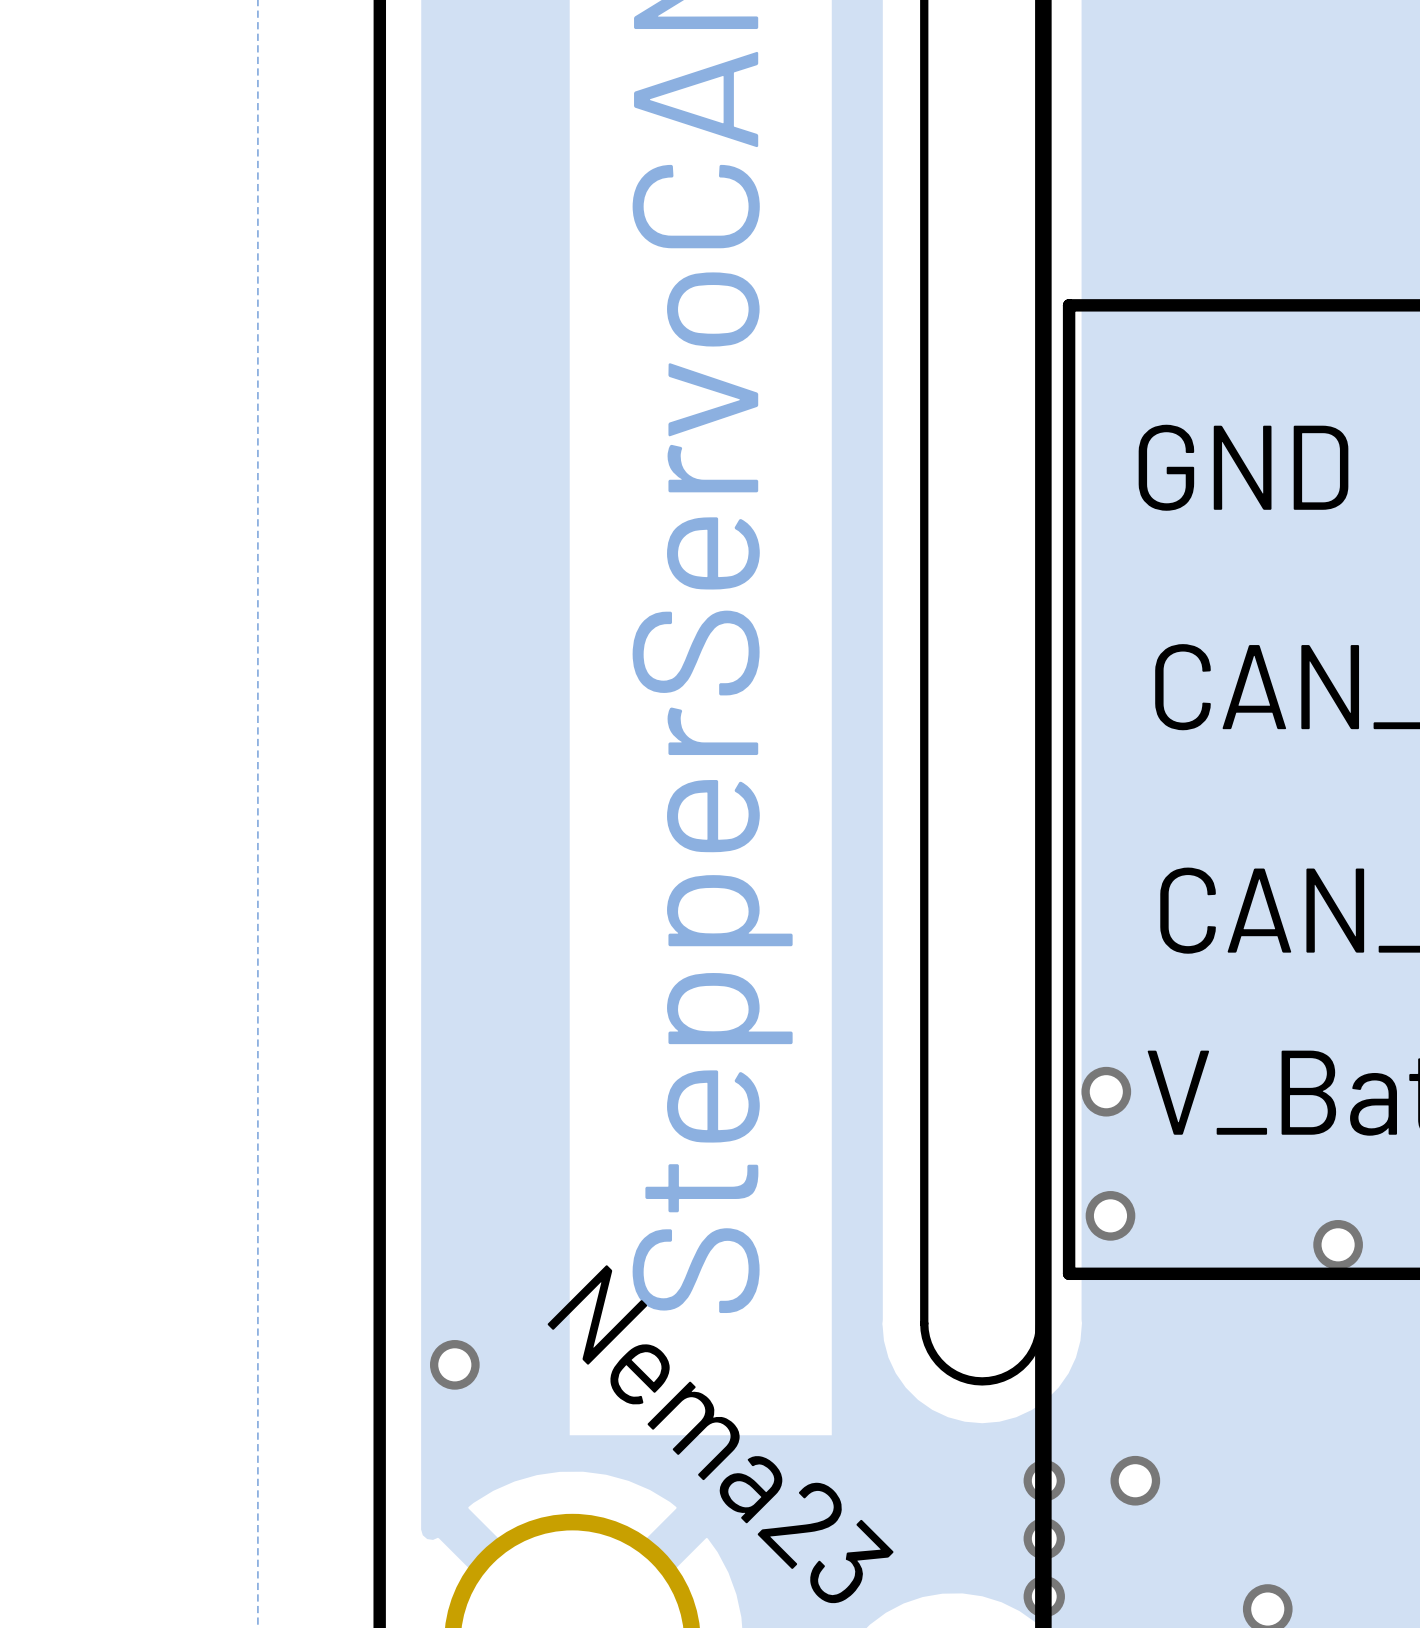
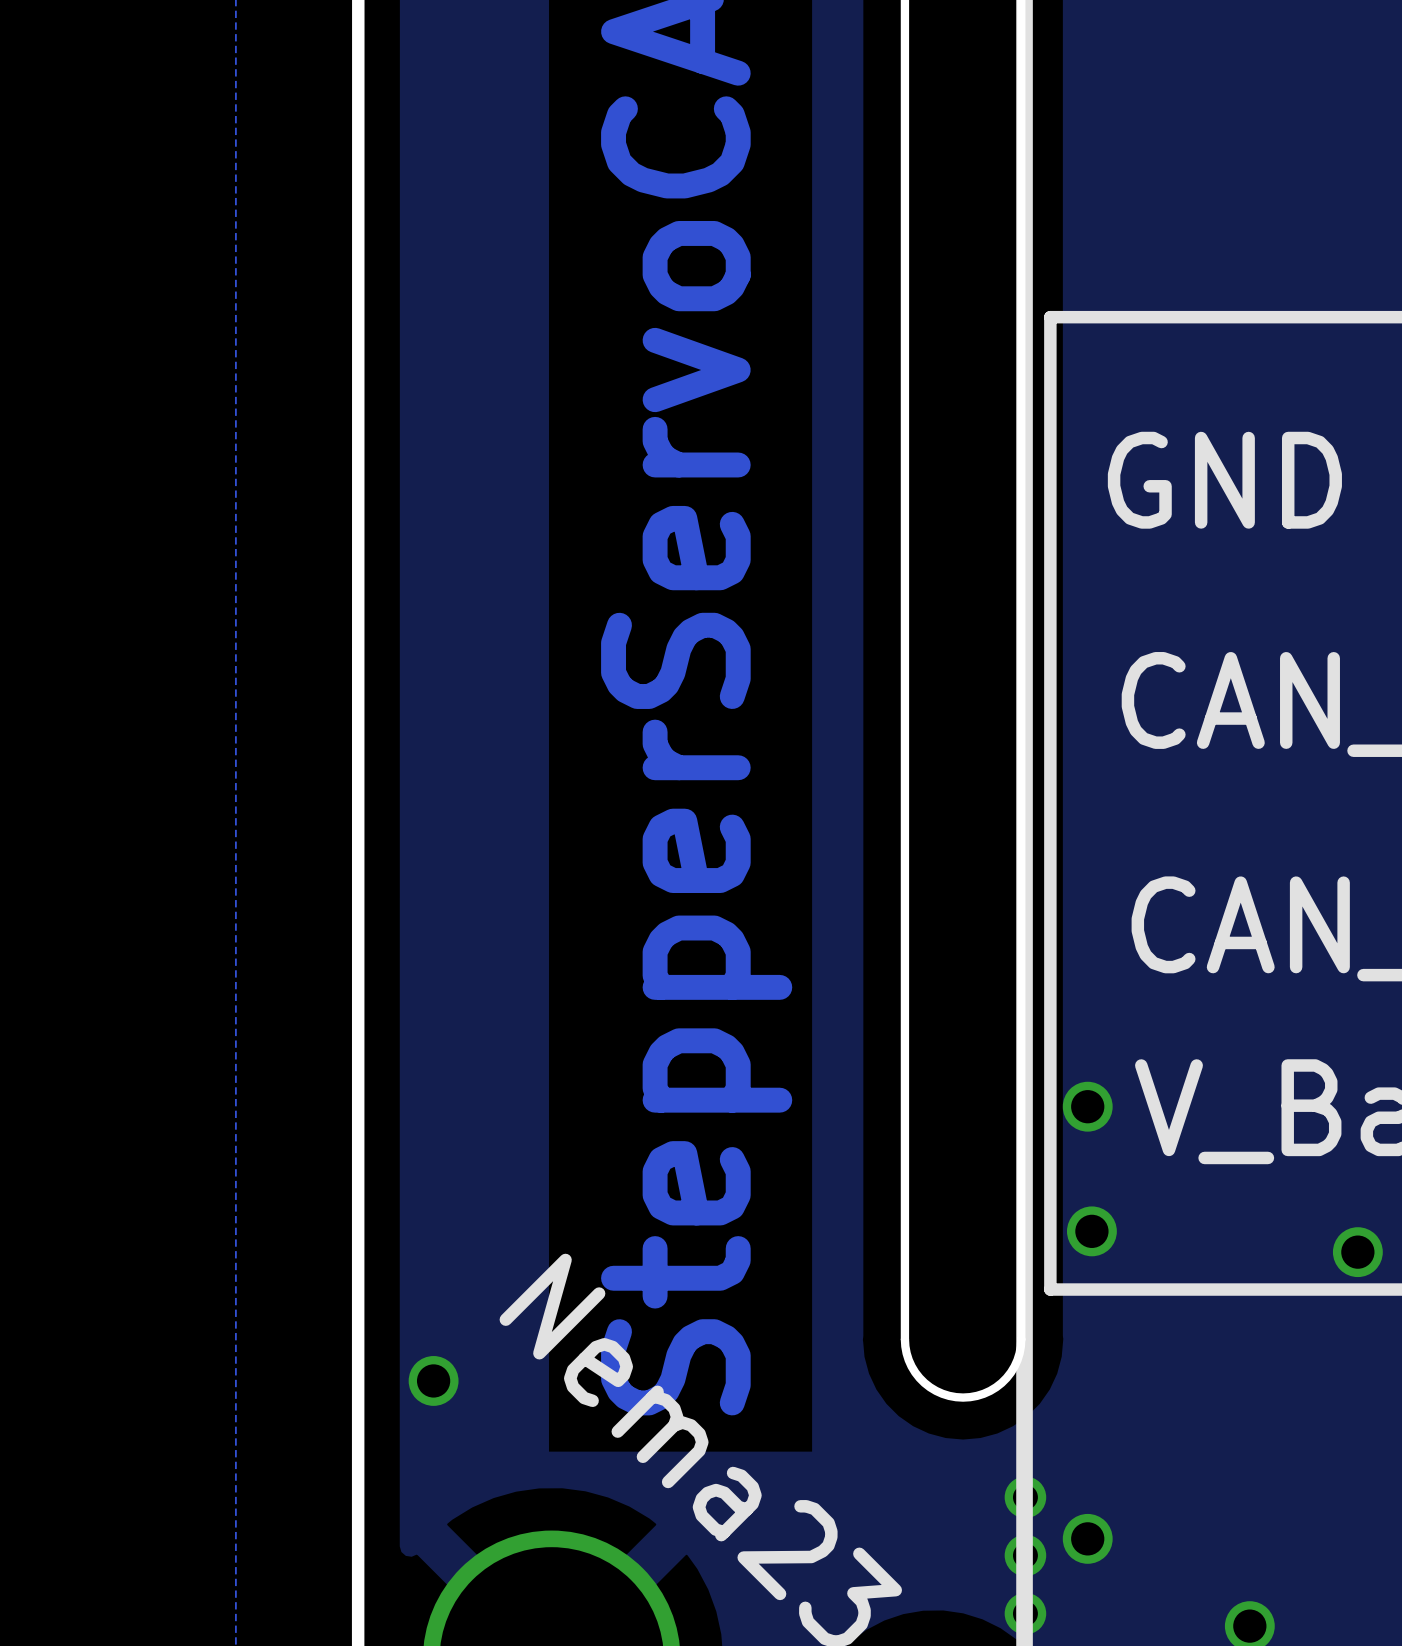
via position: (1338, 1244) -> (1357, 1252)
via position: (1135, 1480) -> (1087, 1538)

